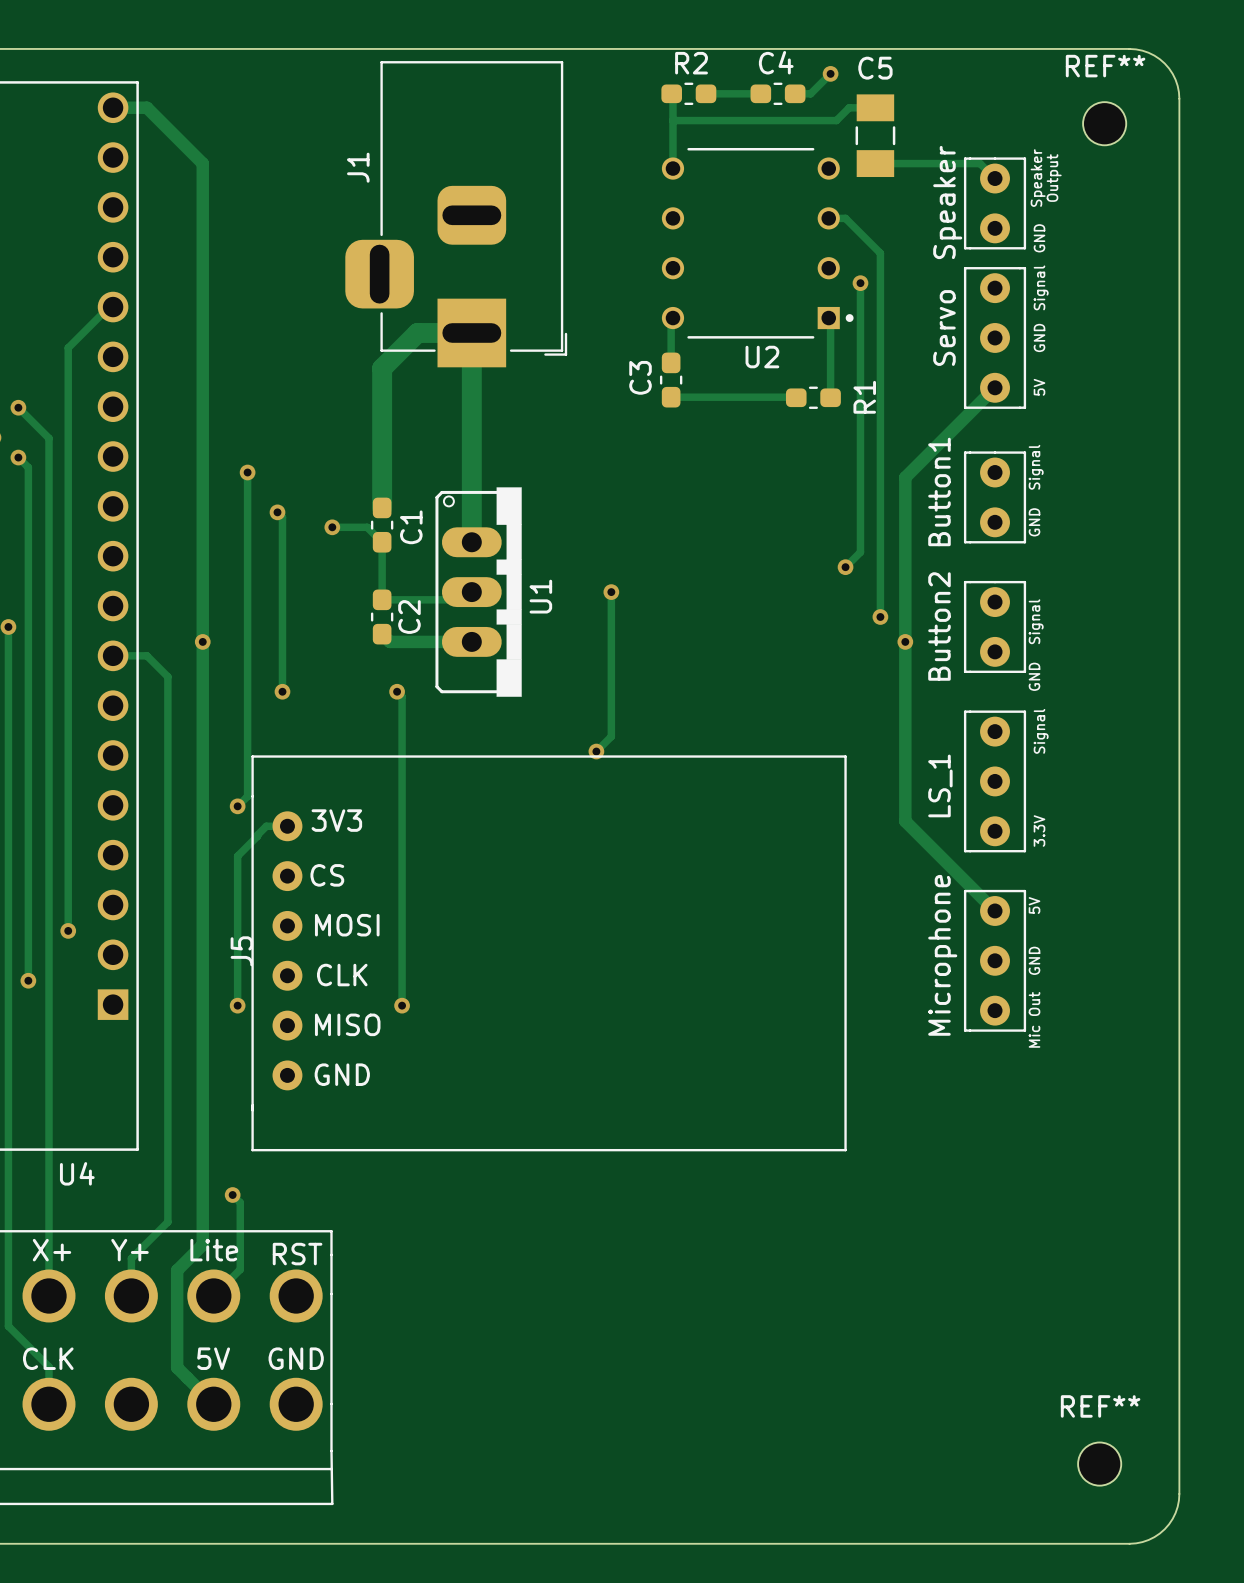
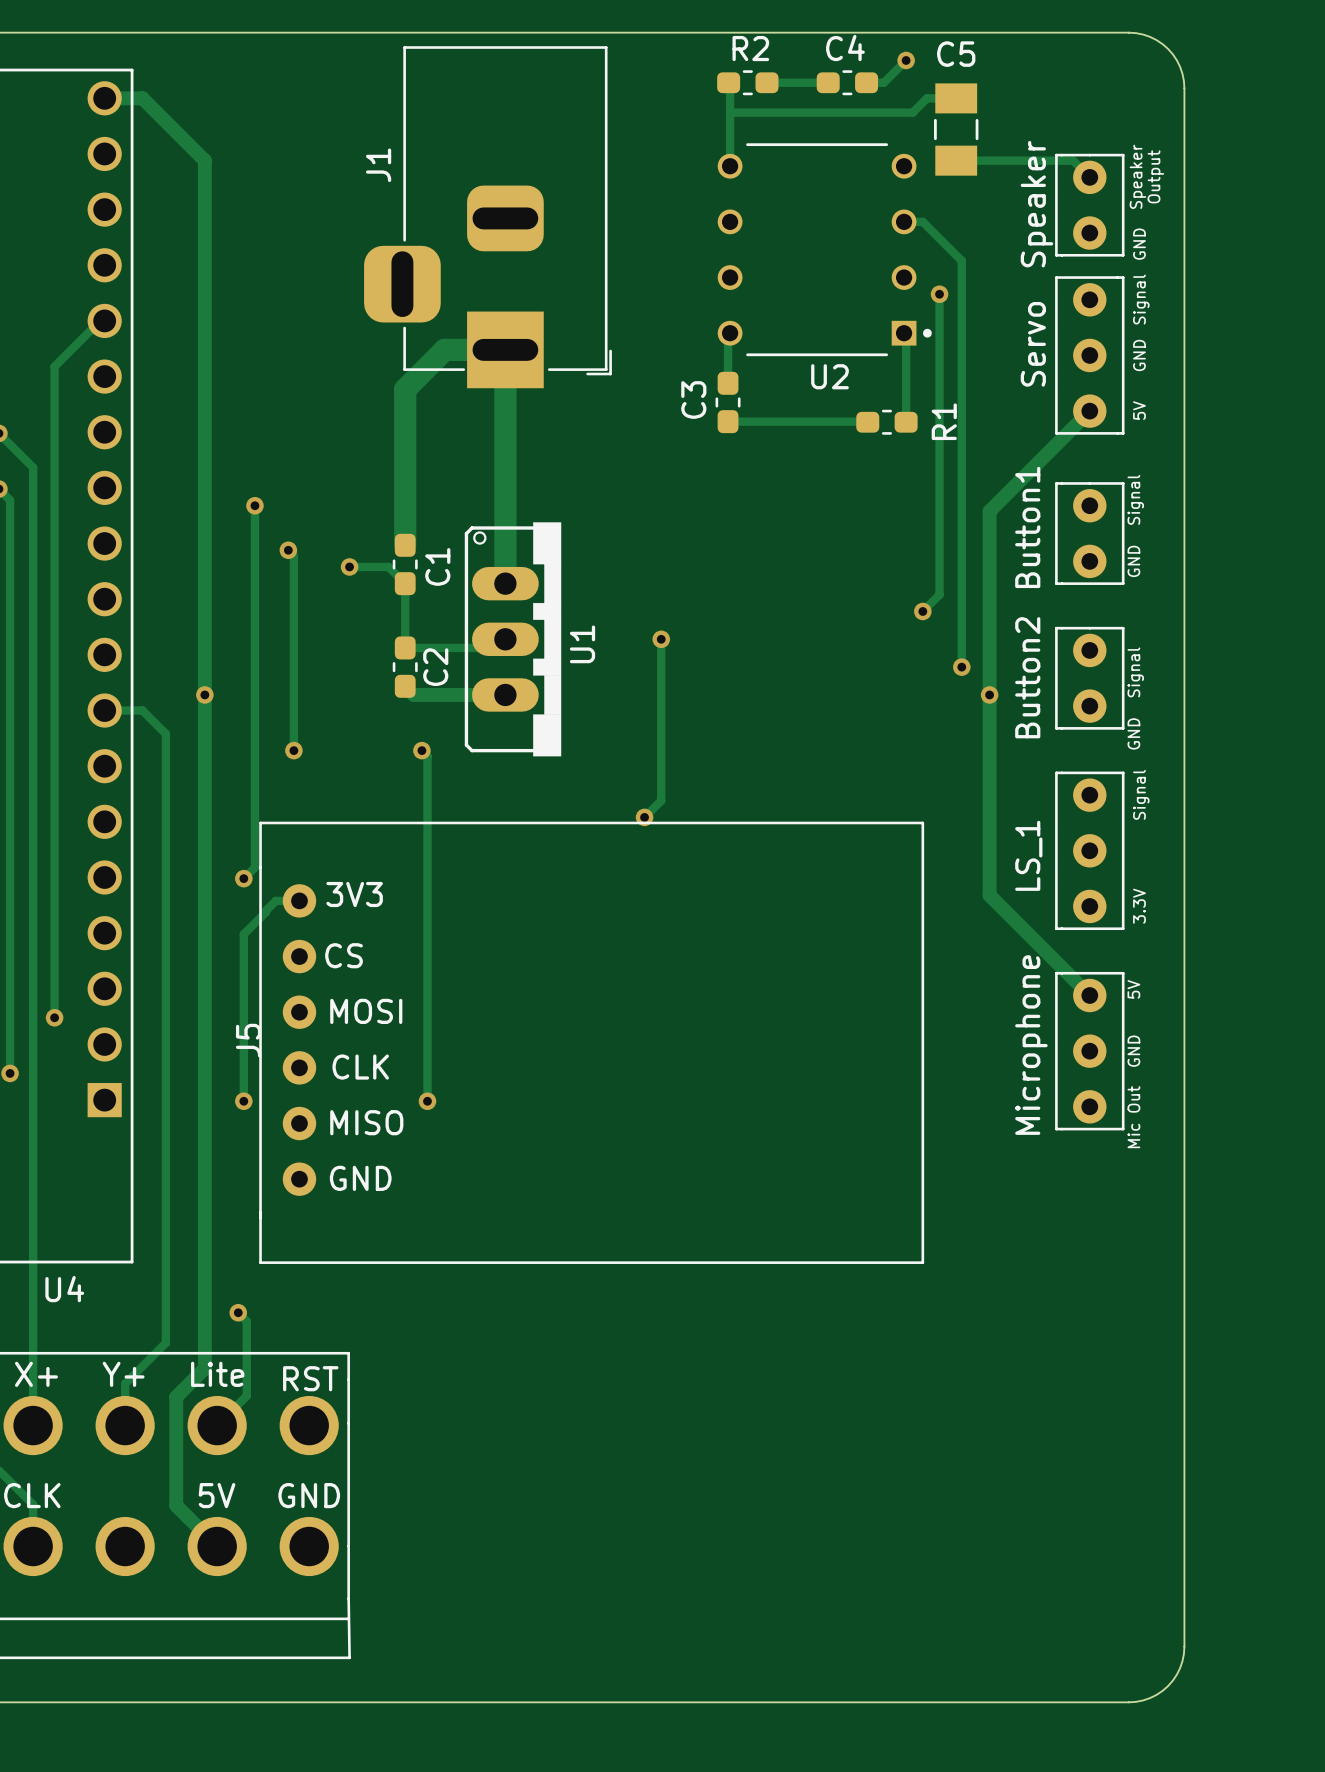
board edge: (1029, 48) (1129, 48) (1142, 50) (1159, 59) (1169, 68) (1177, 85) (1179, 98) (1178, 1500) (1175, 1513) (1164, 1529) (1154, 1537) (1142, 1542) (1129, 1543) (1029, 1543) -> (1128, 32) (1150, 36) (1168, 48) (1180, 67) (1184, 88) (1184, 1646) (1180, 1667) (1168, 1686) (1150, 1698) (1128, 1702)
REF**: (1104, 123) -> none
REF**: (1099, 1464) -> none

